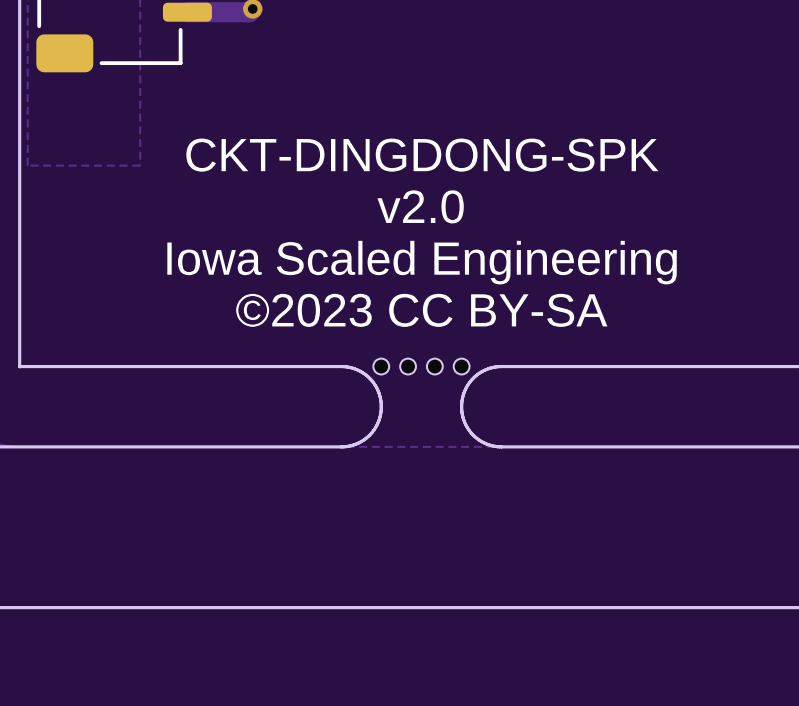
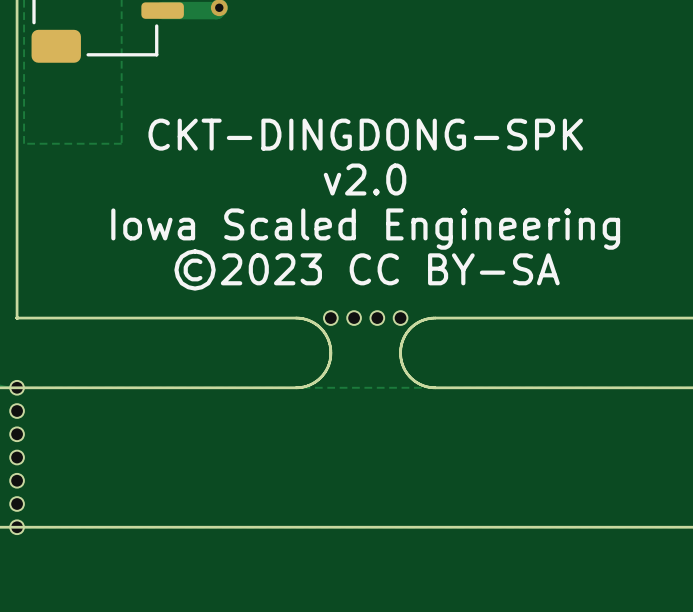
part: none -> (17, 387)
part: none -> (17, 411)
part: none -> (17, 434)
part: none -> (17, 457)
part: none -> (17, 480)
part: none -> (17, 503)
part: none -> (17, 527)

